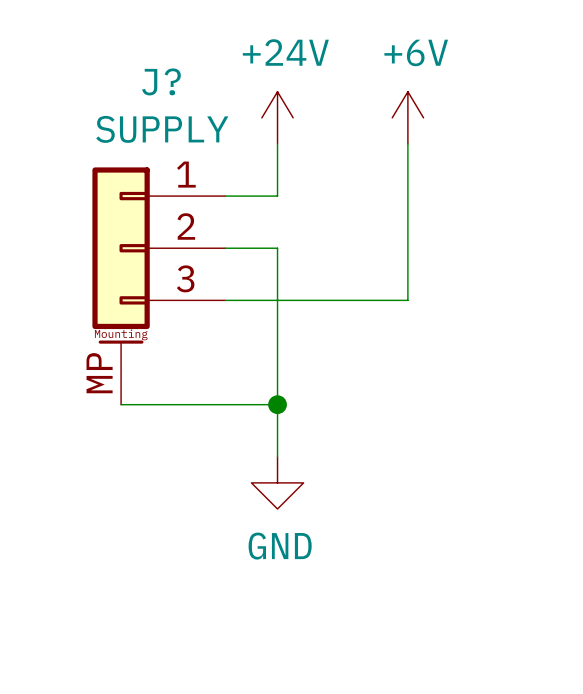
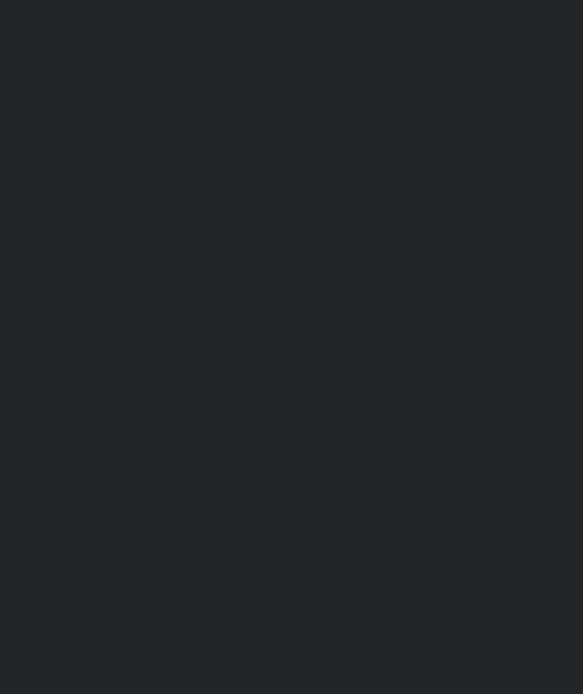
power symbol: +24V (277, 117) -> none
power symbol: +6V (407, 117) -> none
wire: (277, 143) (277, 196) (225, 196) -> none
wire: (407, 143) (407, 300) (225, 300) -> none
wire: (225, 248) (277, 248) (277, 456) -> none
J?: SUPPLY (158, 286) -> none
wire: (121, 404) (277, 404) -> none
junction: (277, 404) -> none
power symbol: GND (277, 482) -> none

